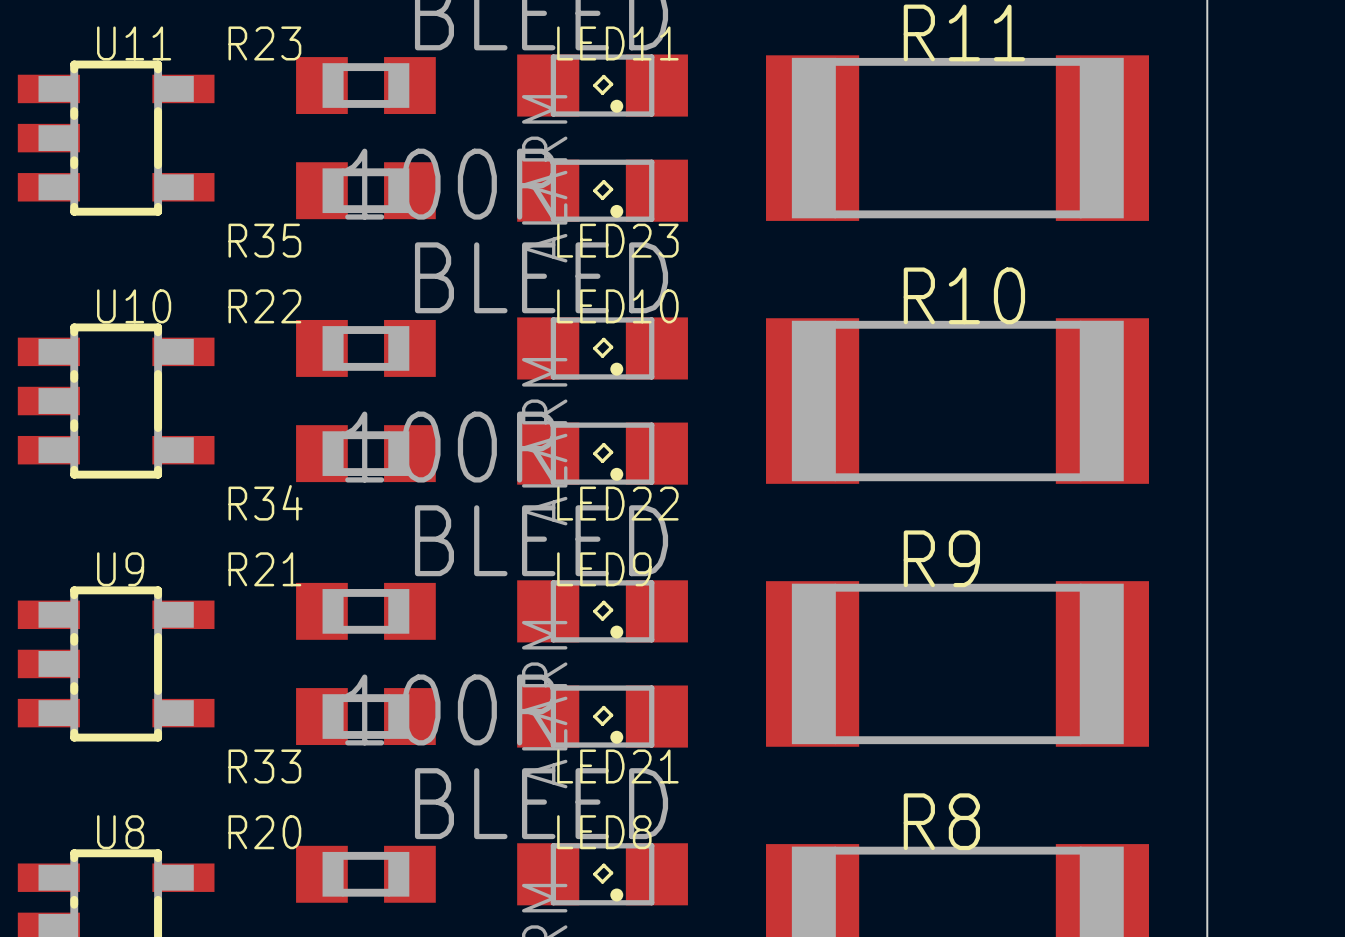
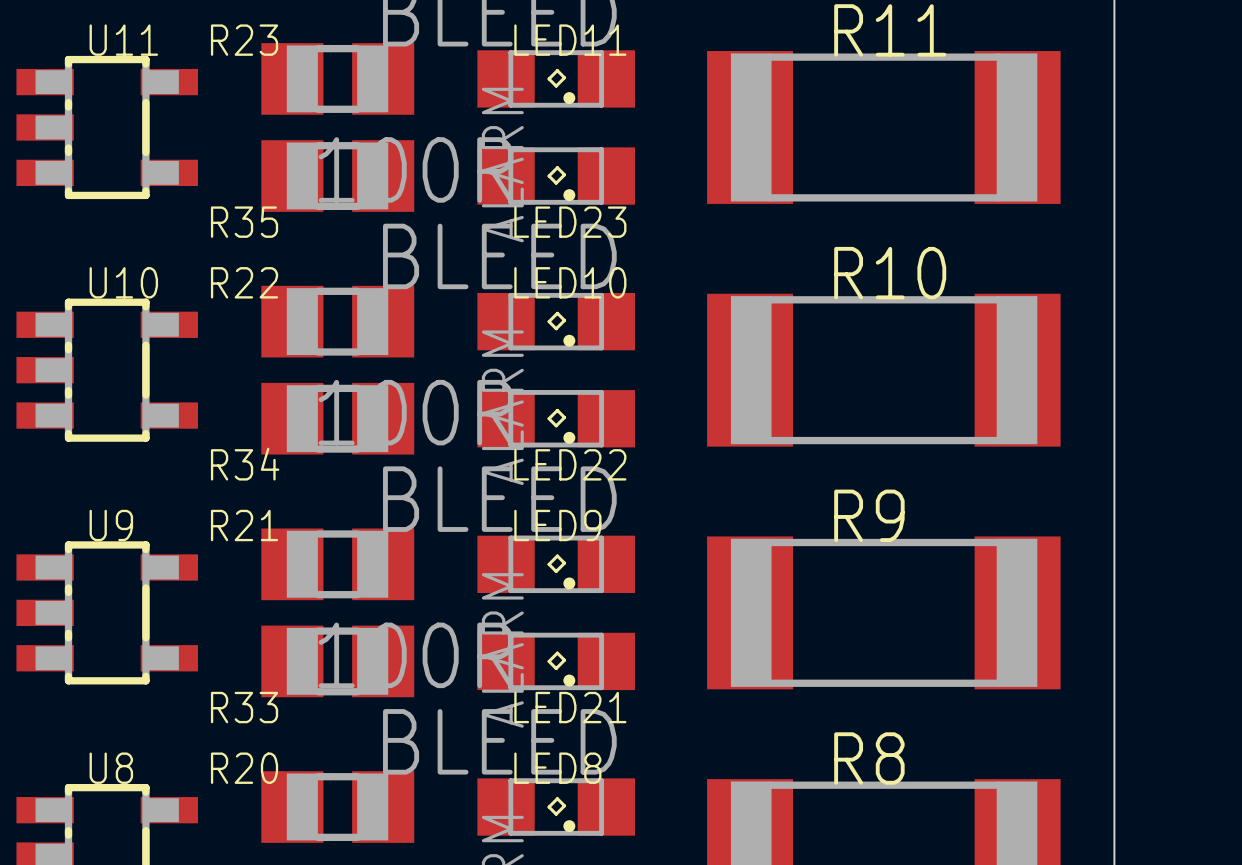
R23 footprint: [296, 57, 436, 114] -> [261, 43, 415, 115]
R35 footprint: [296, 162, 436, 220] -> [261, 140, 415, 212]
R22 footprint: [296, 319, 436, 377] -> [261, 285, 415, 358]
R34 footprint: [296, 425, 436, 483] -> [261, 382, 415, 455]
R21 footprint: [296, 582, 436, 640] -> [261, 528, 415, 601]
R33 footprint: [296, 688, 436, 746] -> [261, 625, 415, 698]
R20 footprint: [296, 845, 436, 903] -> [261, 771, 415, 843]

